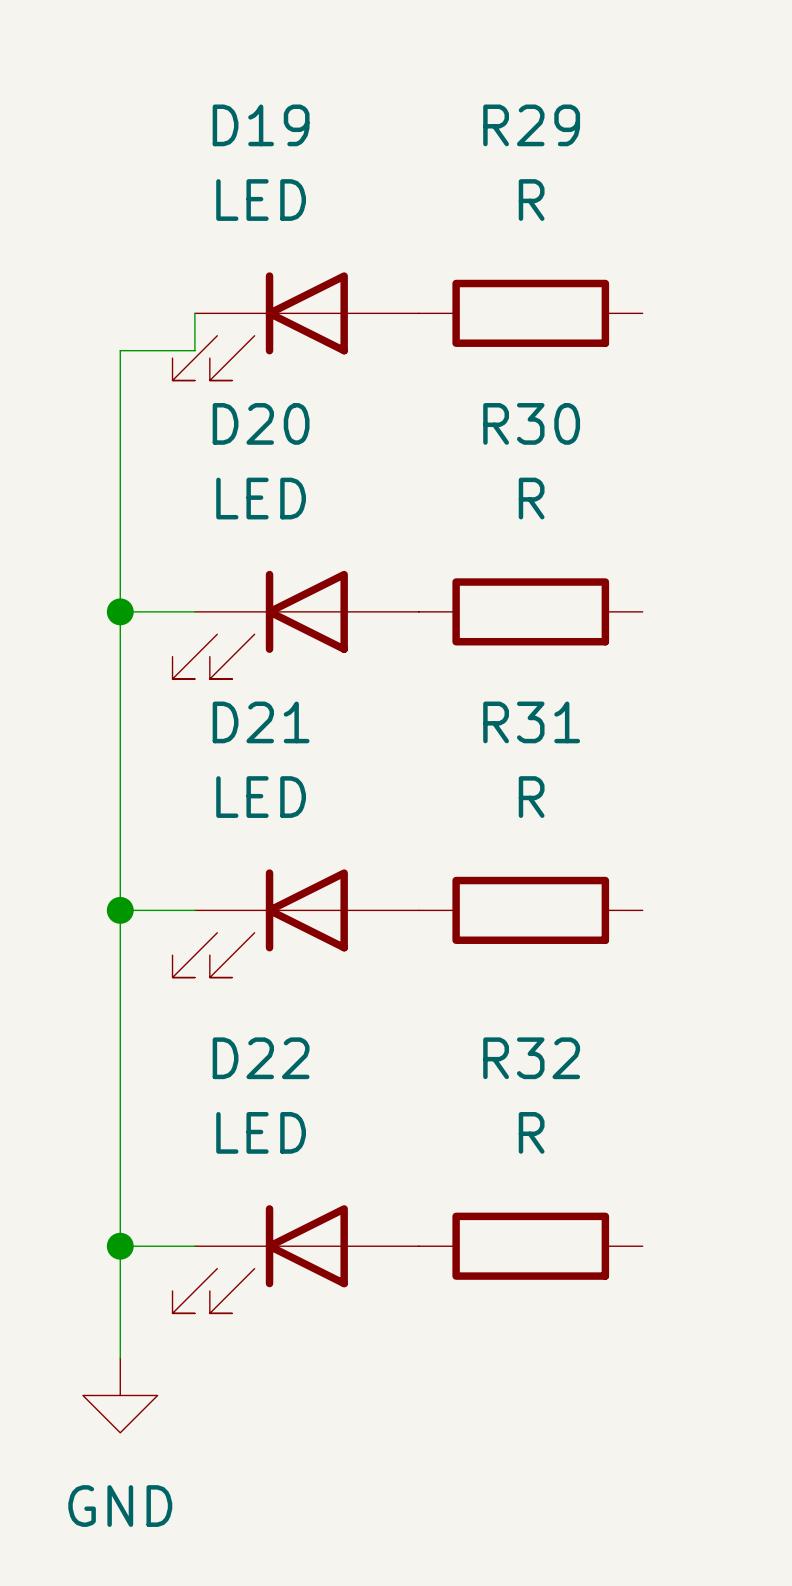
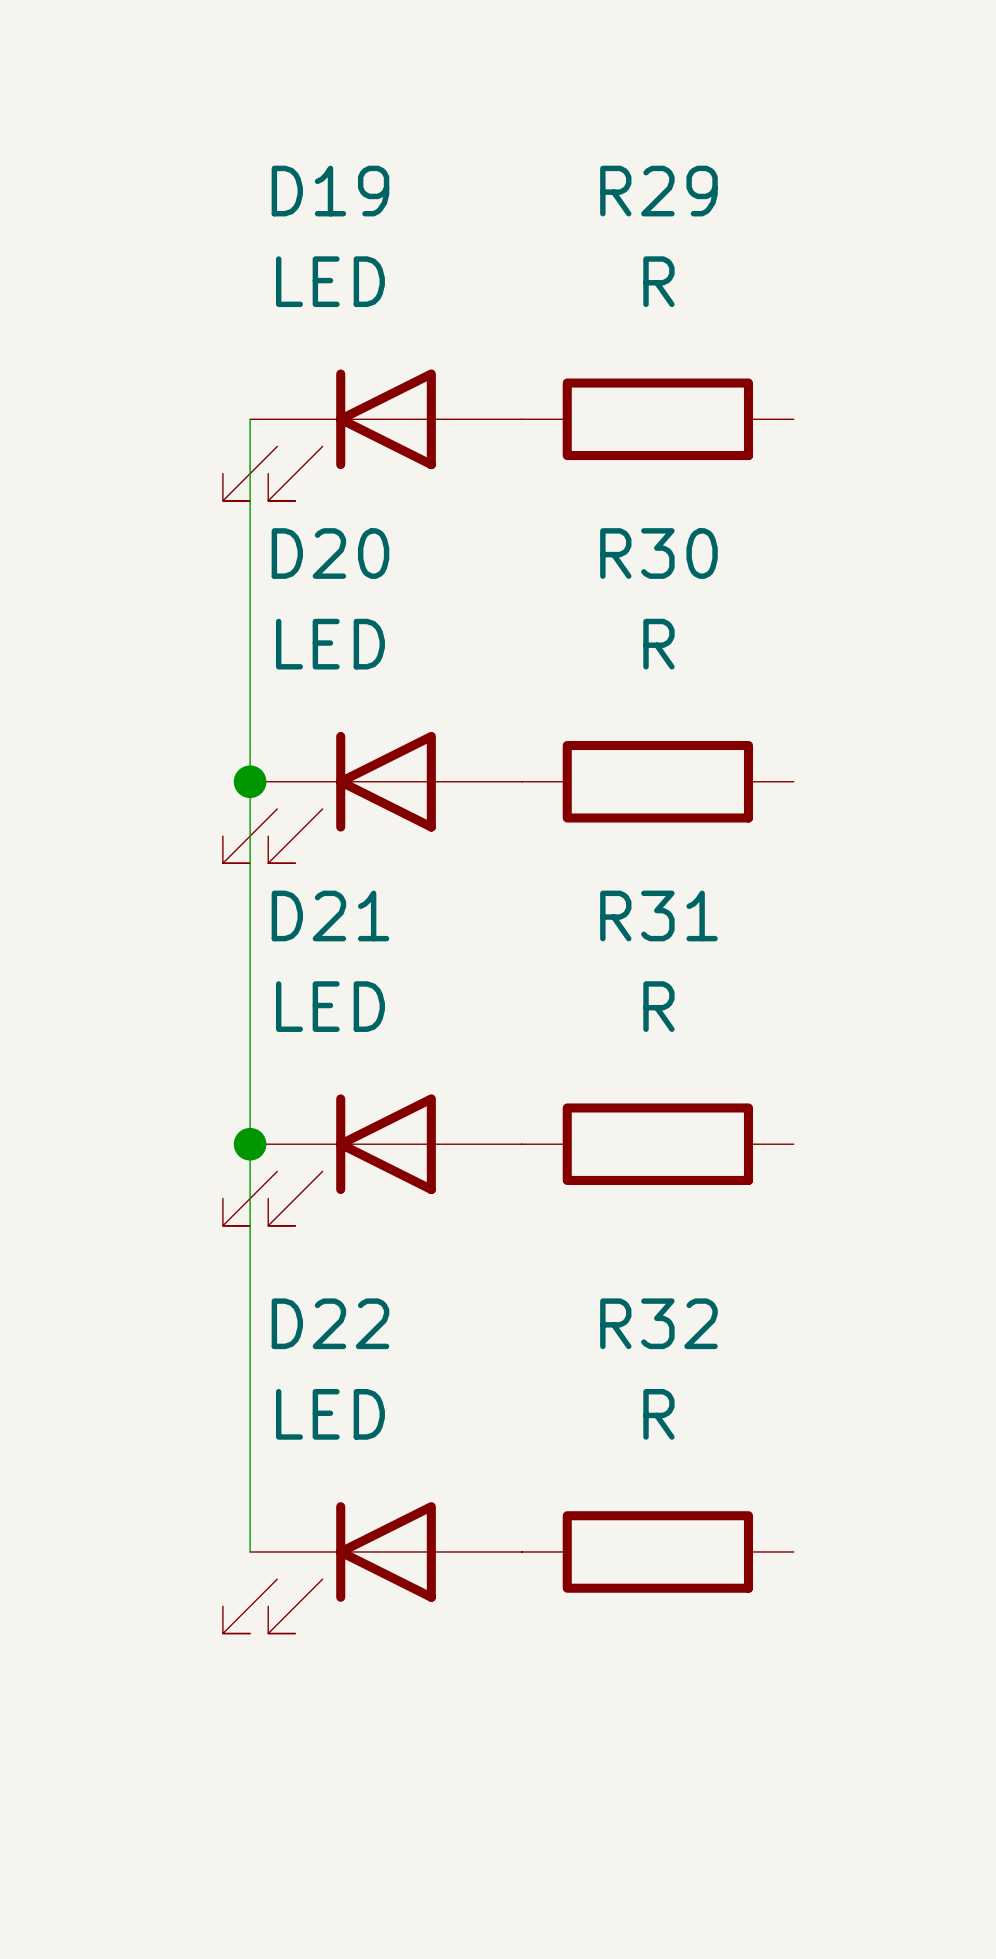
wire: (194, 350) (120, 350) (120, 1358) -> (250, 464) (250, 1551)
wire: (120, 611) (194, 611) -> none
junction position: (120, 611) -> (250, 781)
wire: (120, 910) (194, 910) -> none
junction position: (120, 910) -> (250, 1144)
wire: (120, 1246) (194, 1246) -> none
junction: (120, 1246) -> none
power symbol: GND (120, 1395) -> none

